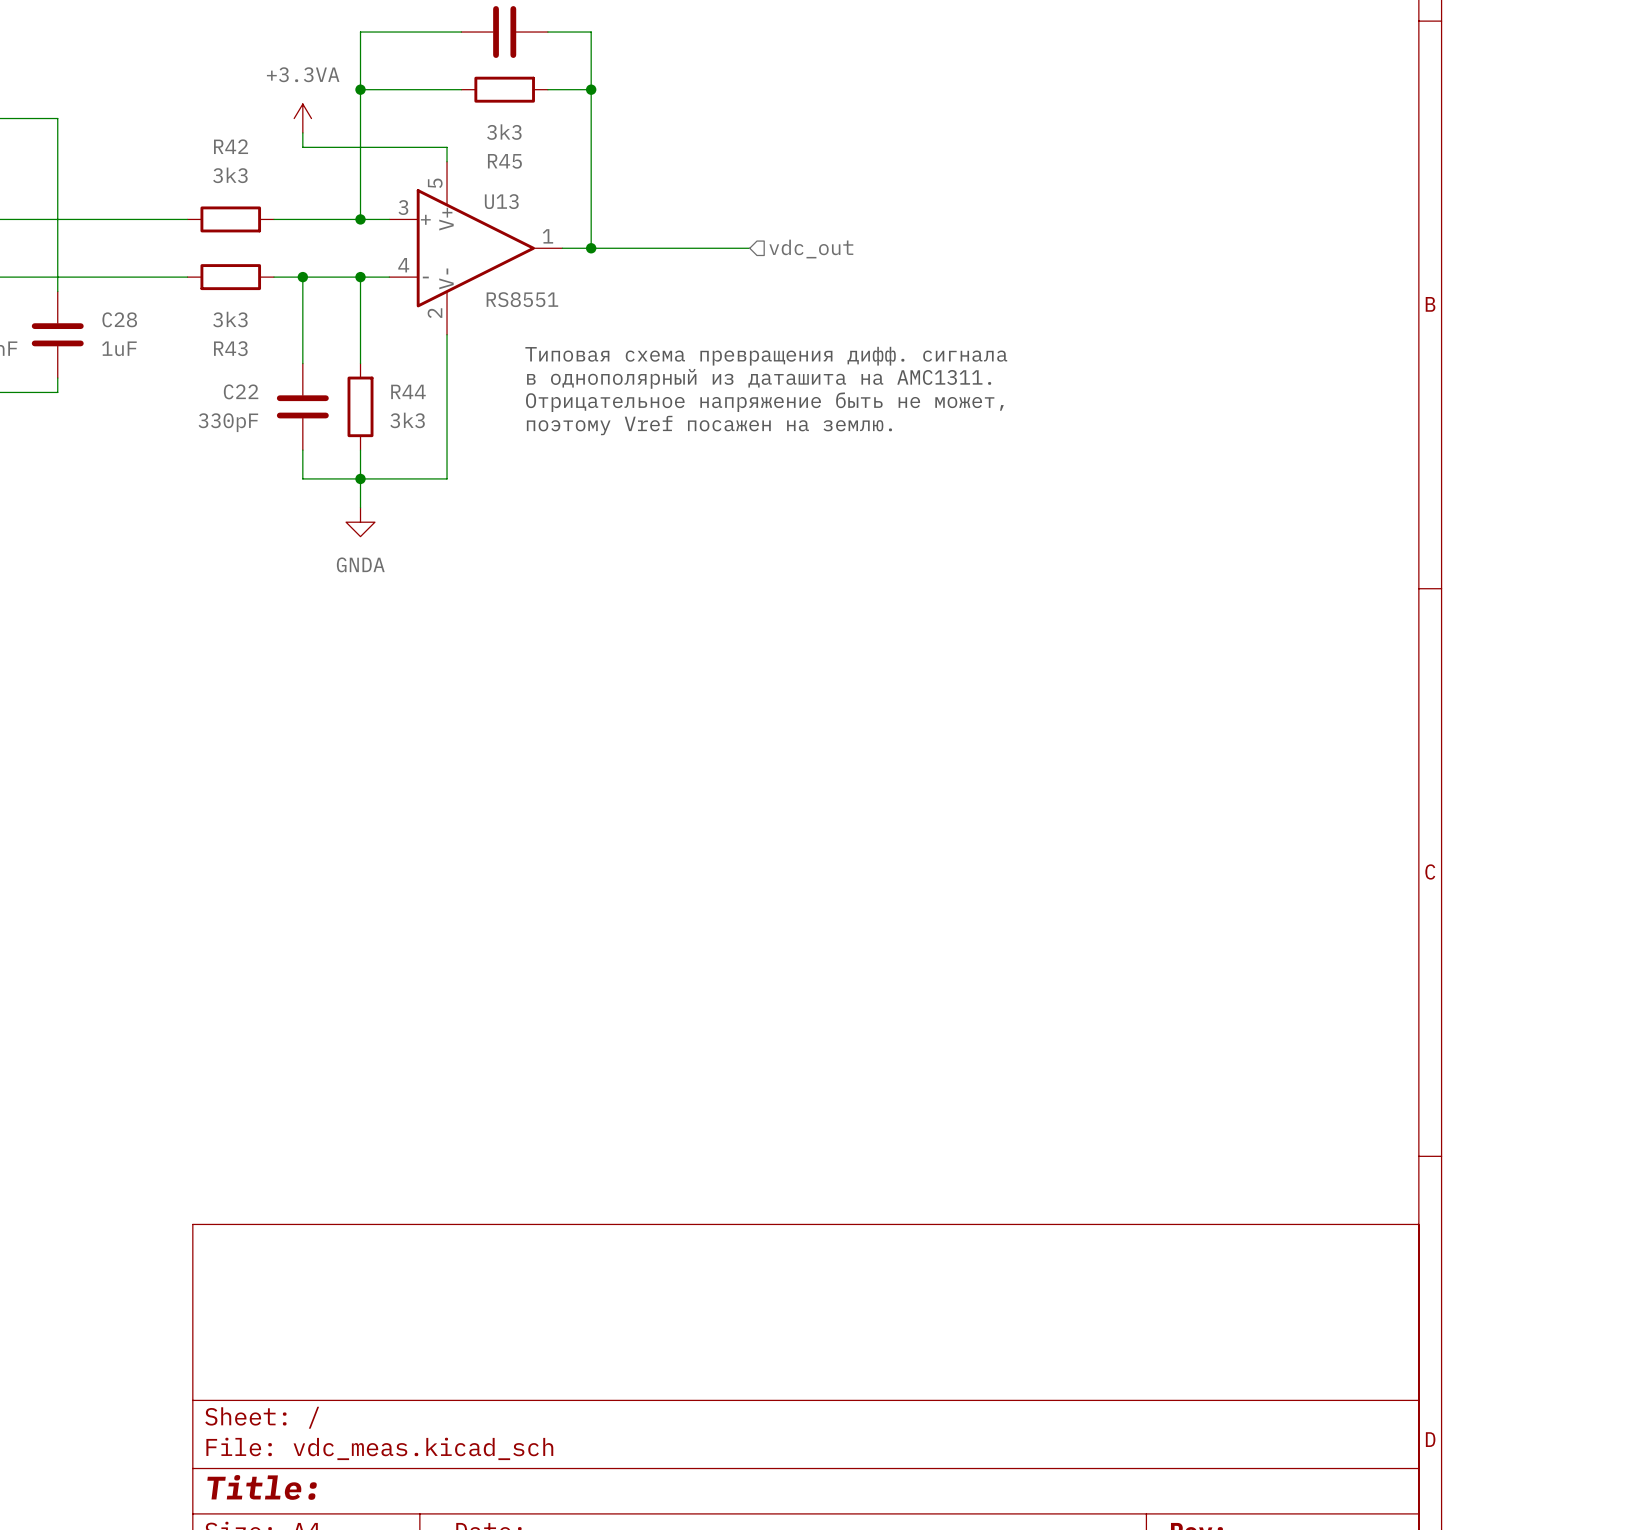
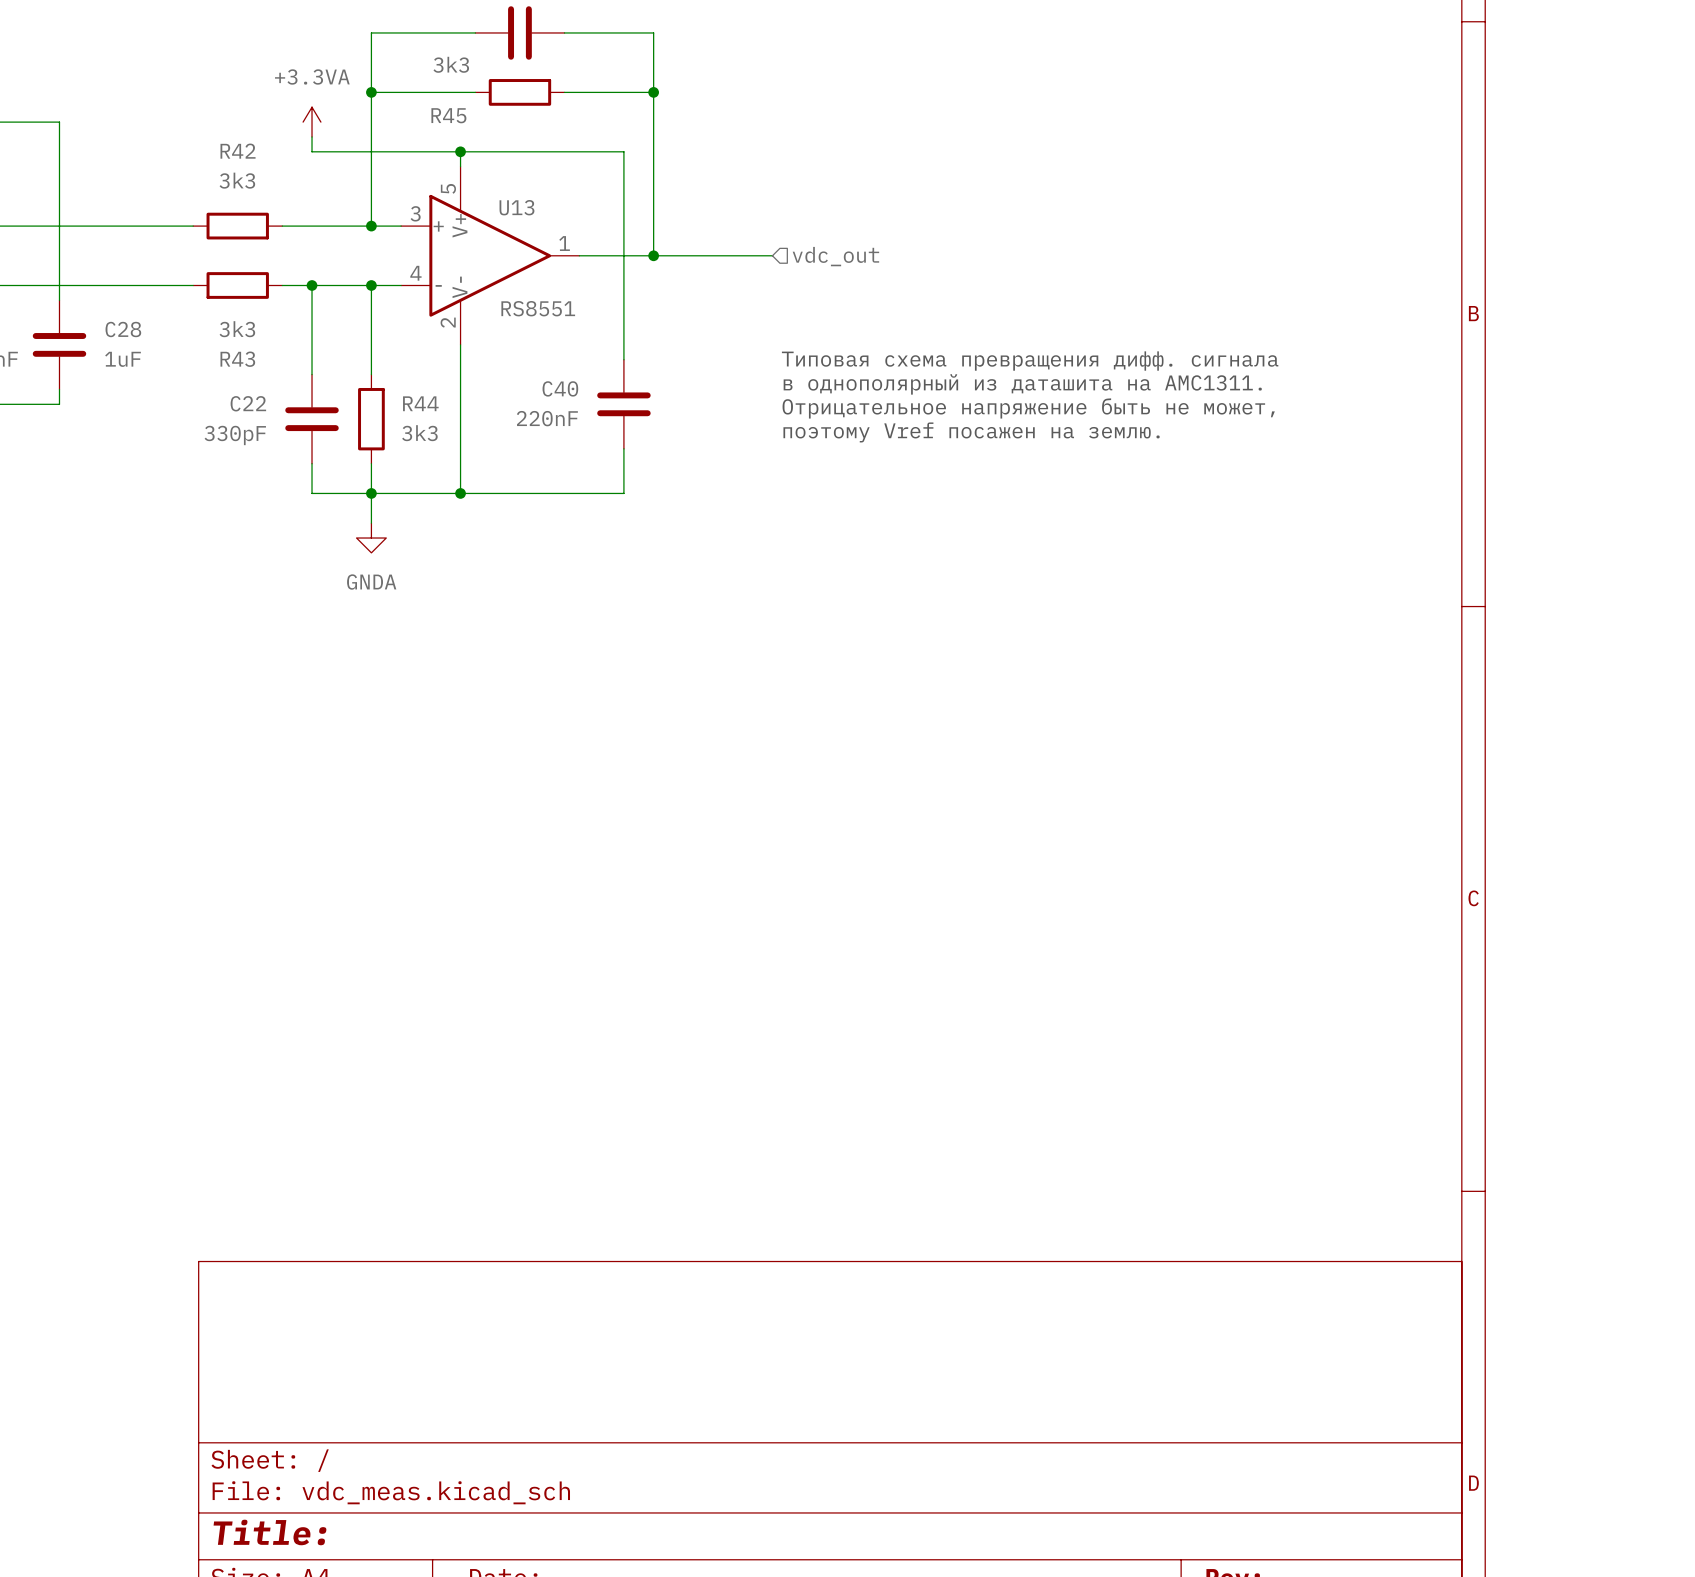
wire: (591, 32) (591, 248) -> (609, 32) (653, 32) (653, 255)
wire: none -> (609, 92) (653, 92)
junction position: (591, 89) -> (653, 92)
R45 value position: 3k3 (504, 132) -> 3k3 (451, 64)
wire: none -> (460, 151) (623, 151) (623, 359)
junction: none -> (460, 151)
R45 name position: R45 (504, 161) -> R45 (448, 115)
junction position: (591, 248) -> (653, 255)
text position: Типовая схема превращения дифф. сигнала (766, 356) -> Типовая схема превращения дифф. сигнала (1030, 361)
text position: в однополярный из даташита на AMC1311. (759, 378) -> в однополярный из даташита на AMC1311. (1022, 384)
C40: none -> 220nF (623, 404)
text position: Отрицательное напряжение быть не может, (764, 402) -> Отрицательное напряжение быть не может, (1028, 408)
text position: поэтому Vref посажен на землю. (709, 425) -> поэтому Vref посажен на землю. (971, 432)
wire: none -> (623, 448) (623, 493) (460, 493)
junction: none -> (460, 493)

